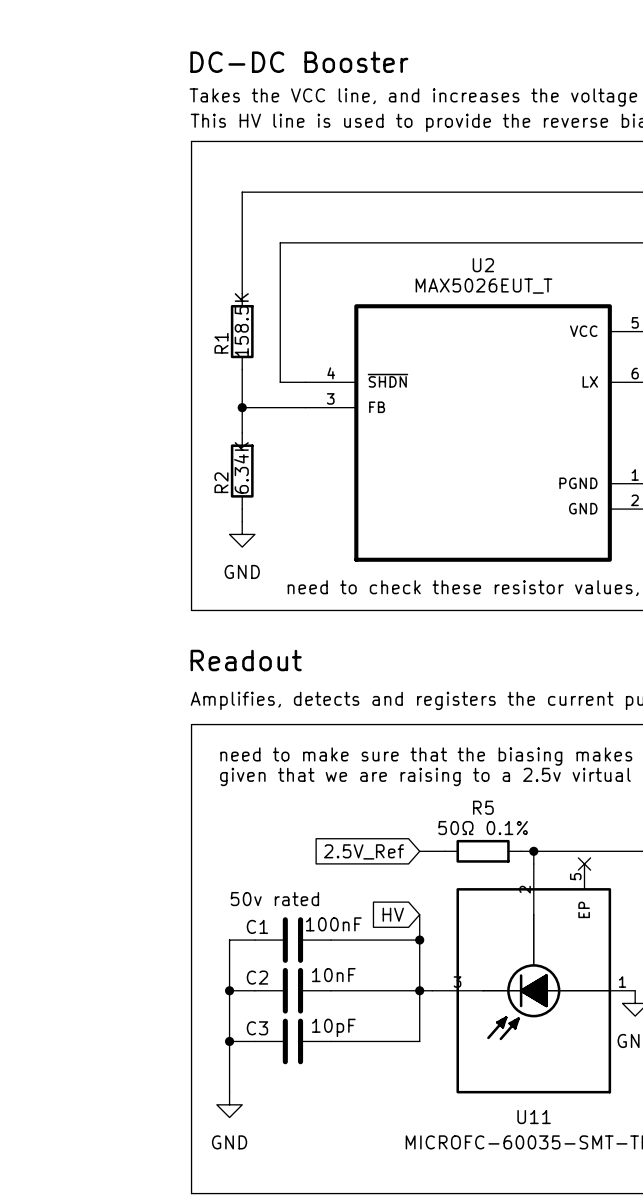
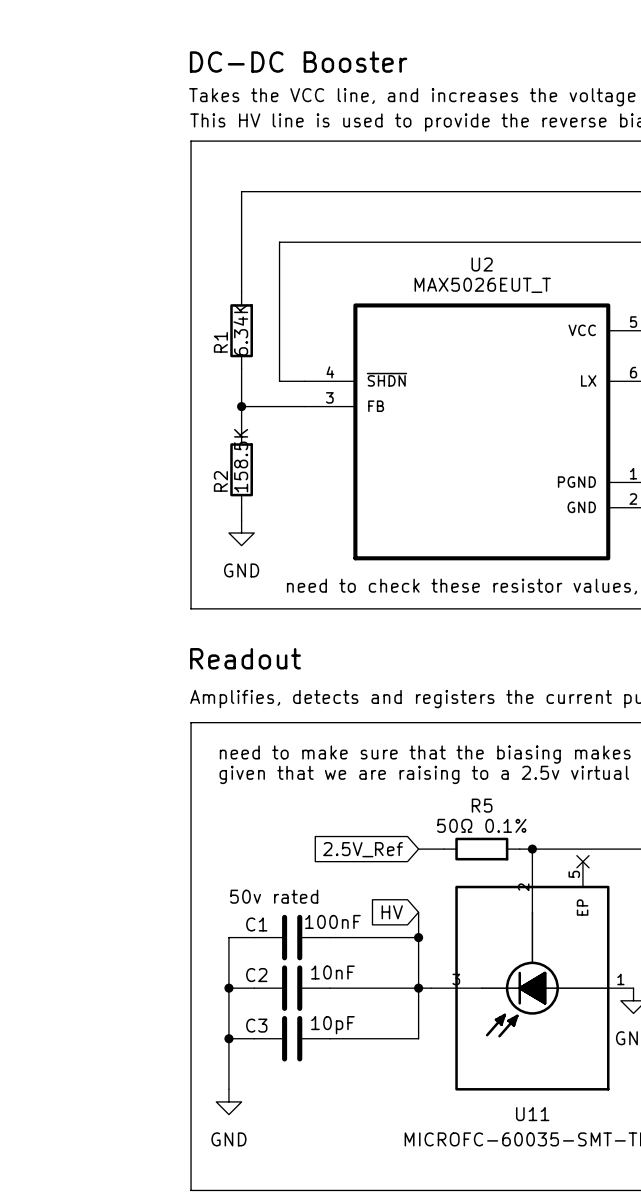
R1 value: 158.5K (241, 324) -> 6.34K (240, 330)
R2 value: 6.34K (241, 467) -> 158.5K (241, 460)

